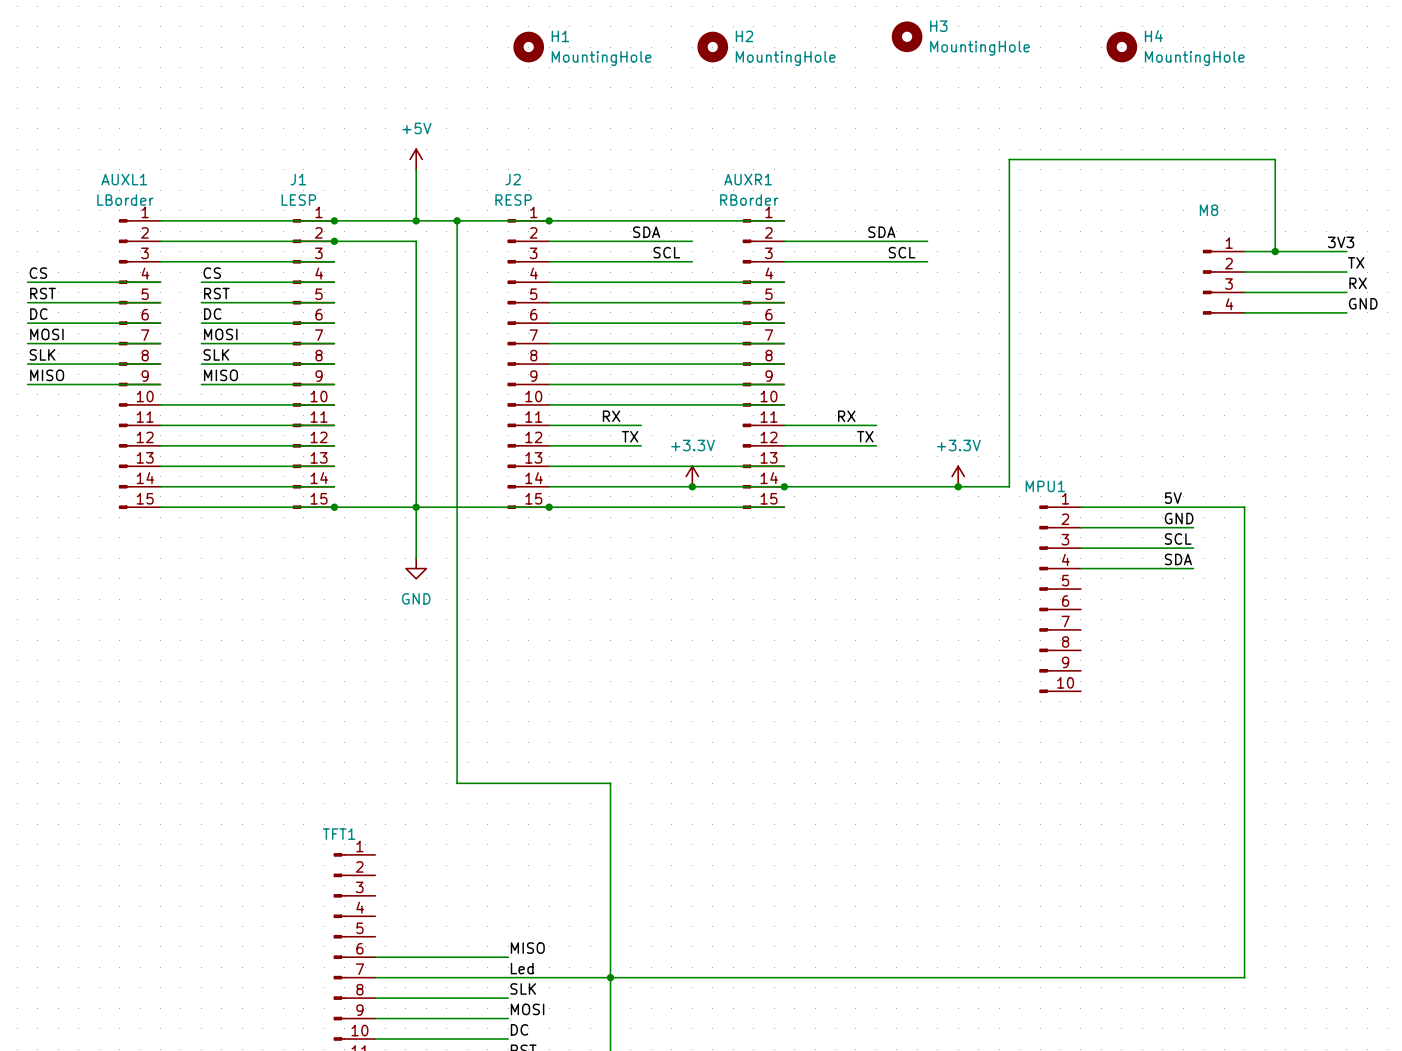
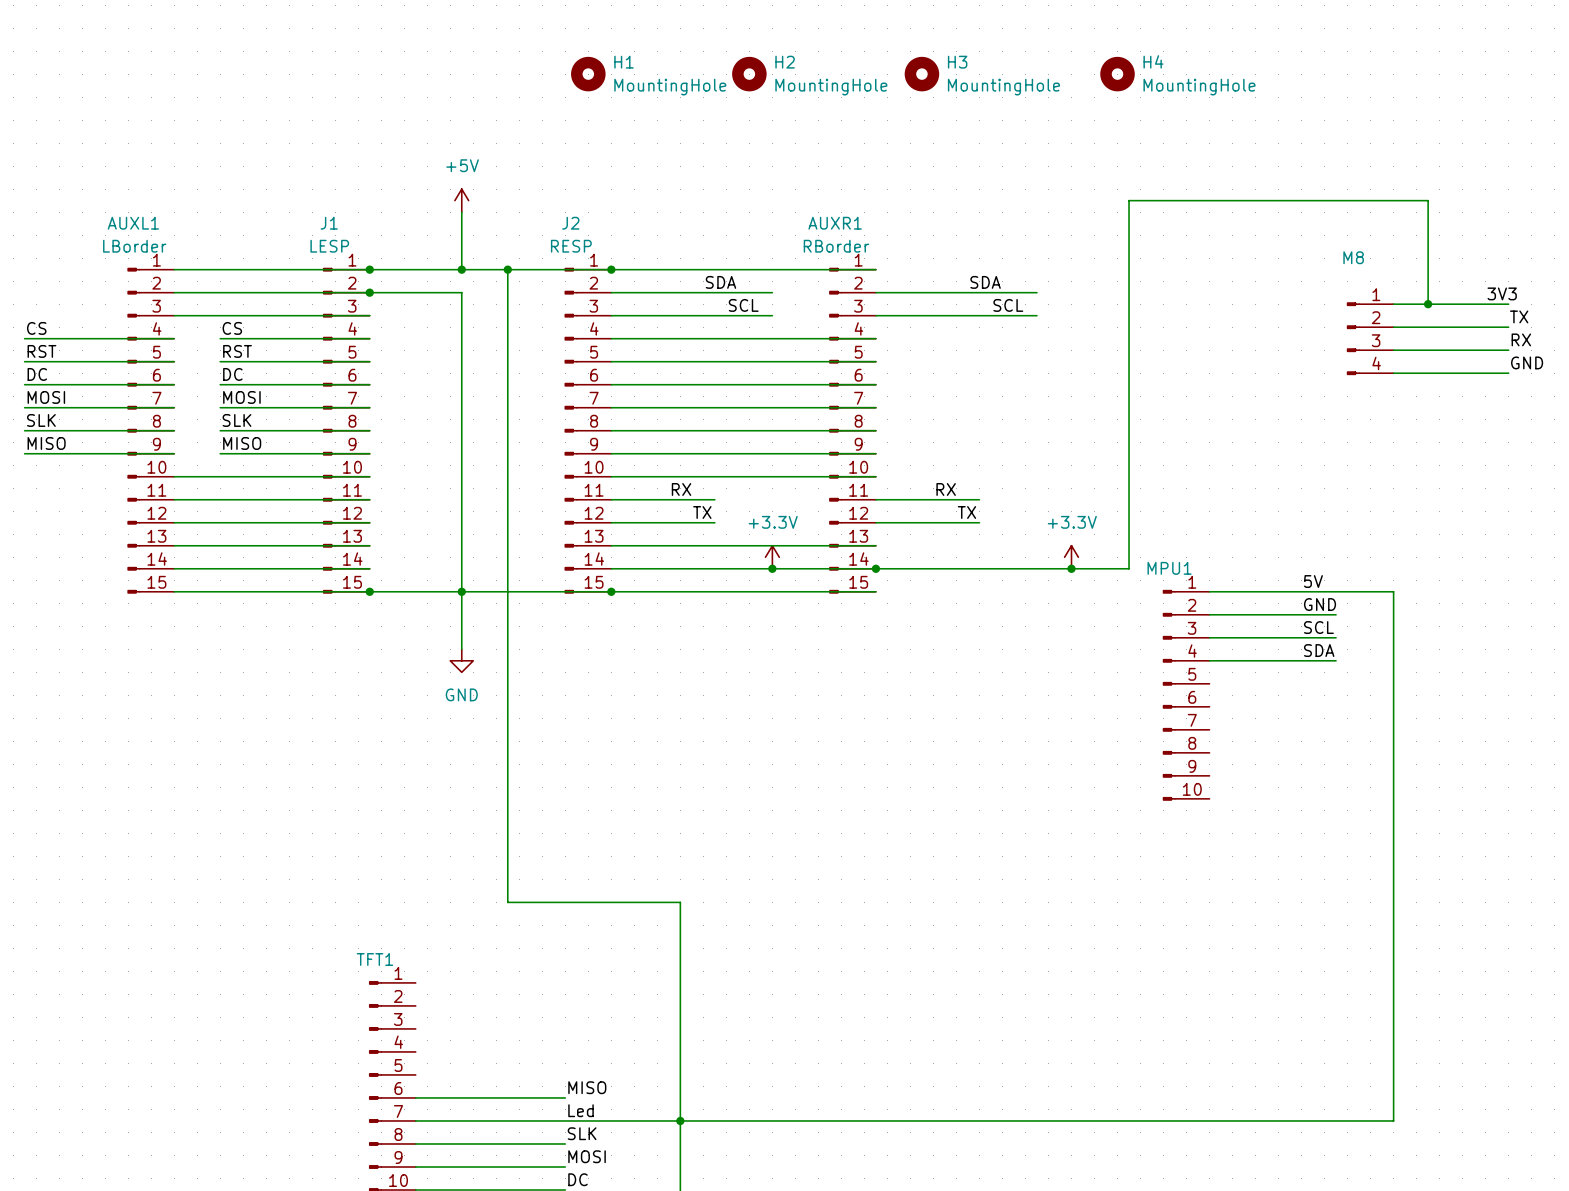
H3 position: (907, 36) -> (921, 74)
H2 position: (712, 47) -> (749, 74)
H4 position: (1121, 47) -> (1117, 74)

